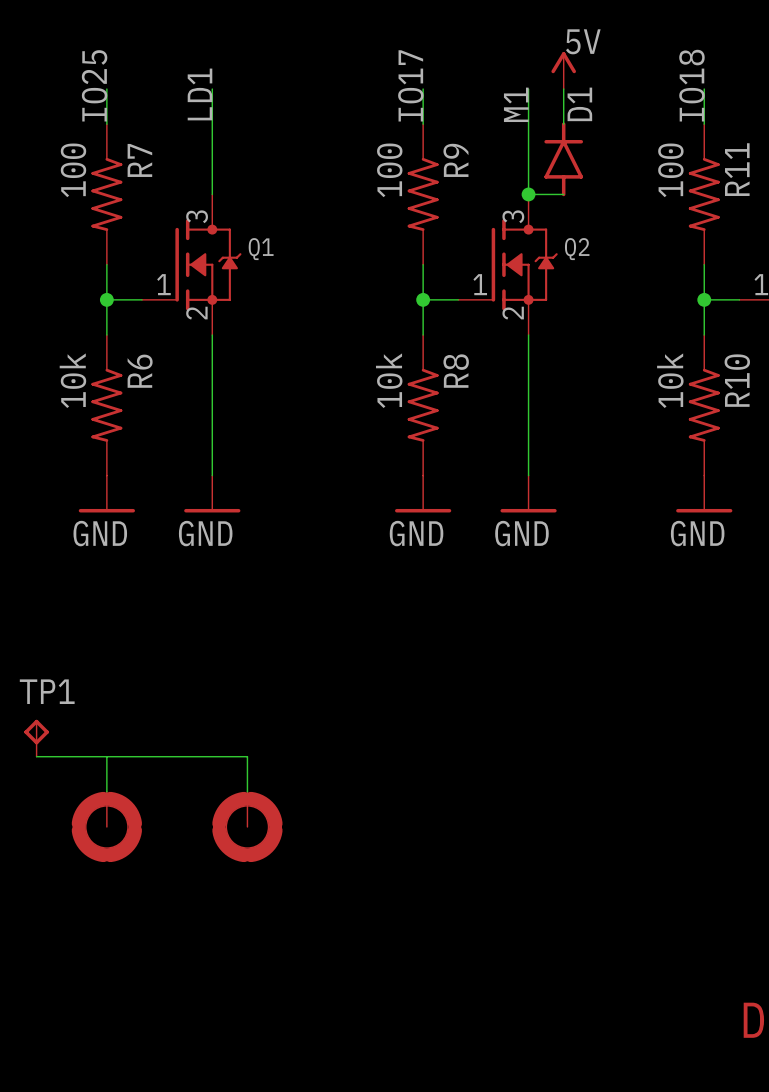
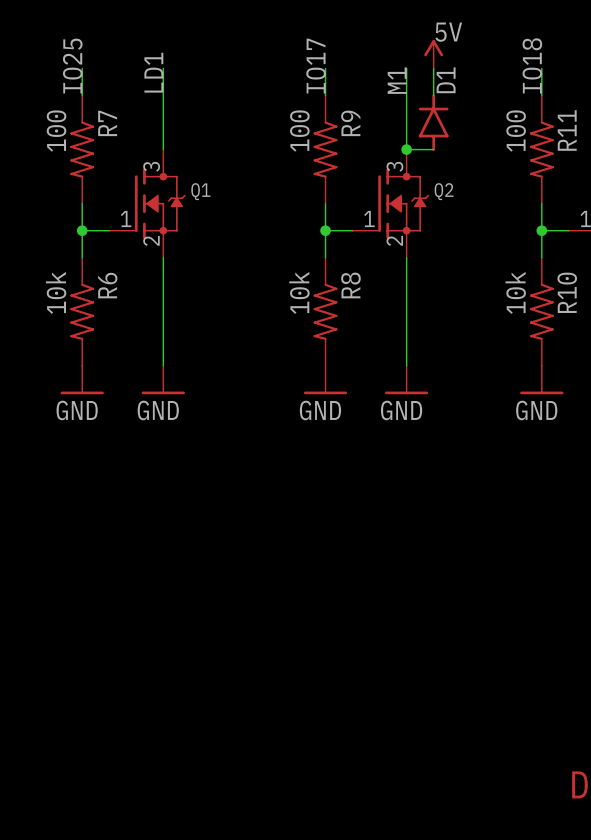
TP1: (36, 738) -> none
wire: (36, 756) (247, 756) (247, 791) -> none
wire: (106, 756) (106, 791) -> none
part: (106, 826) -> none
part: (247, 826) -> none

